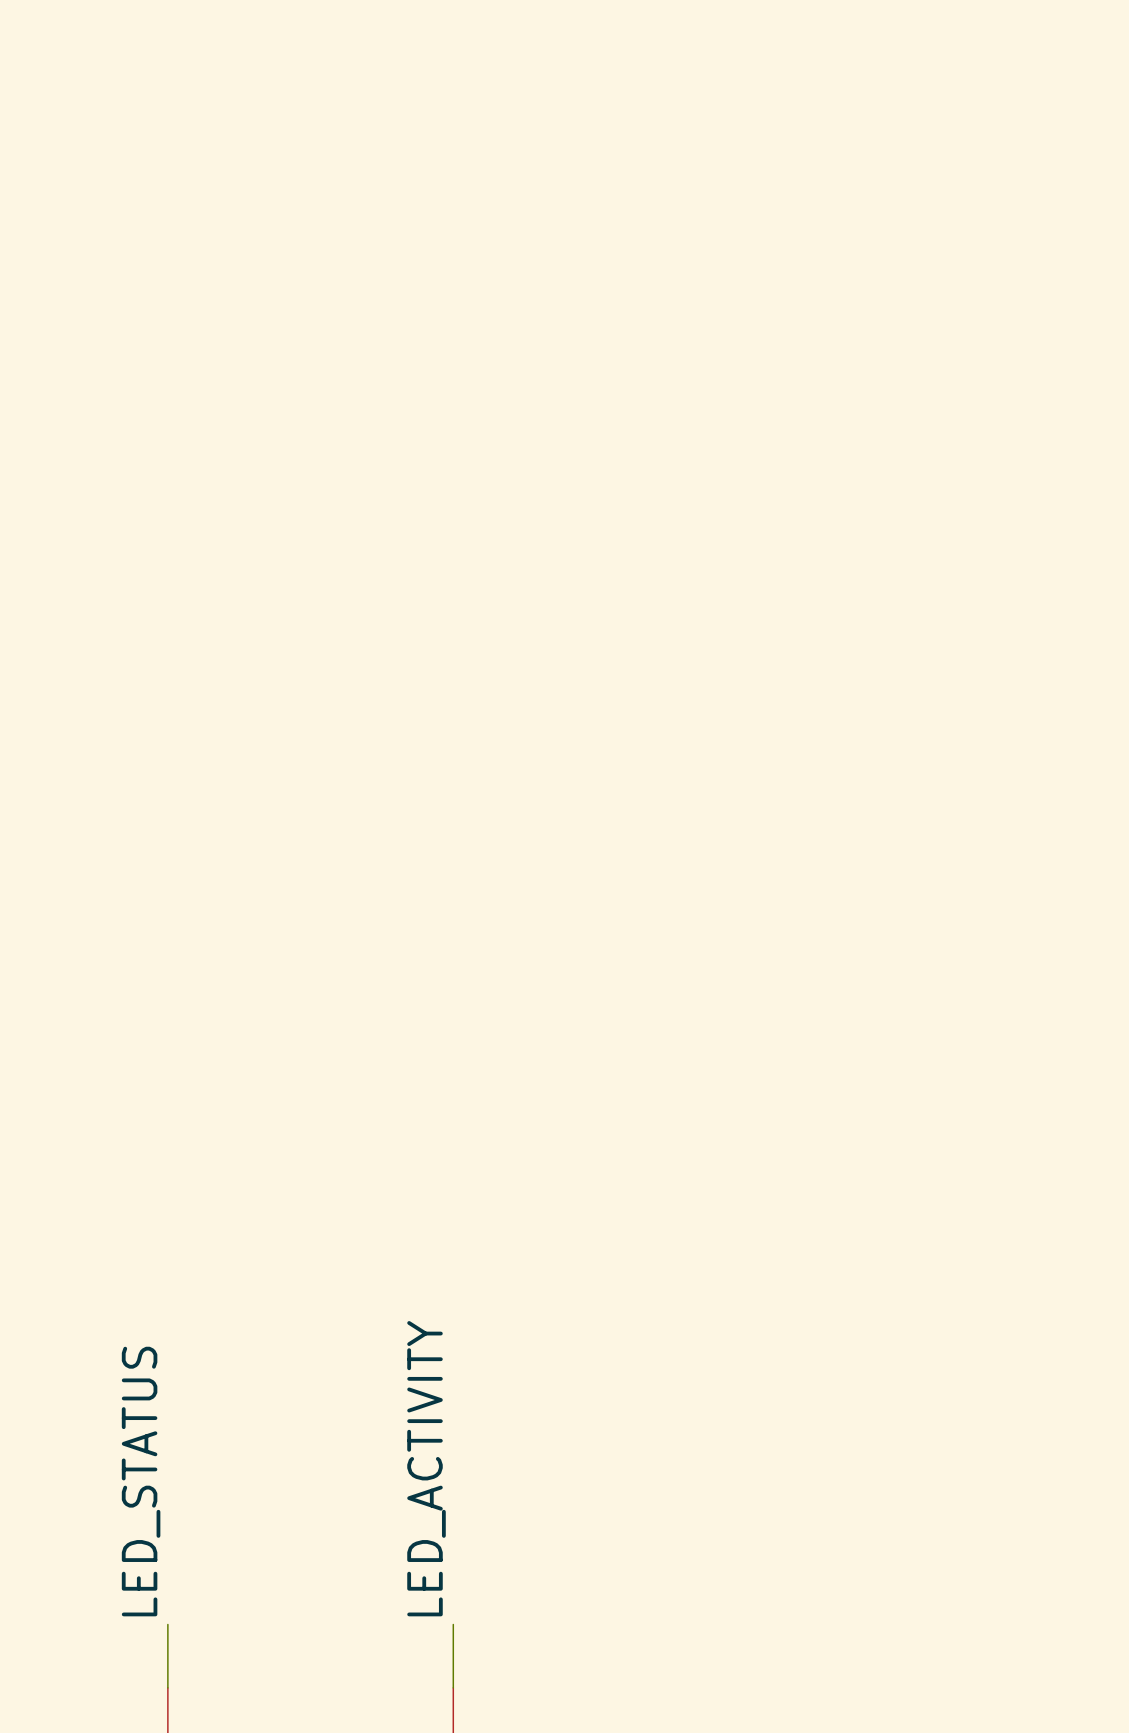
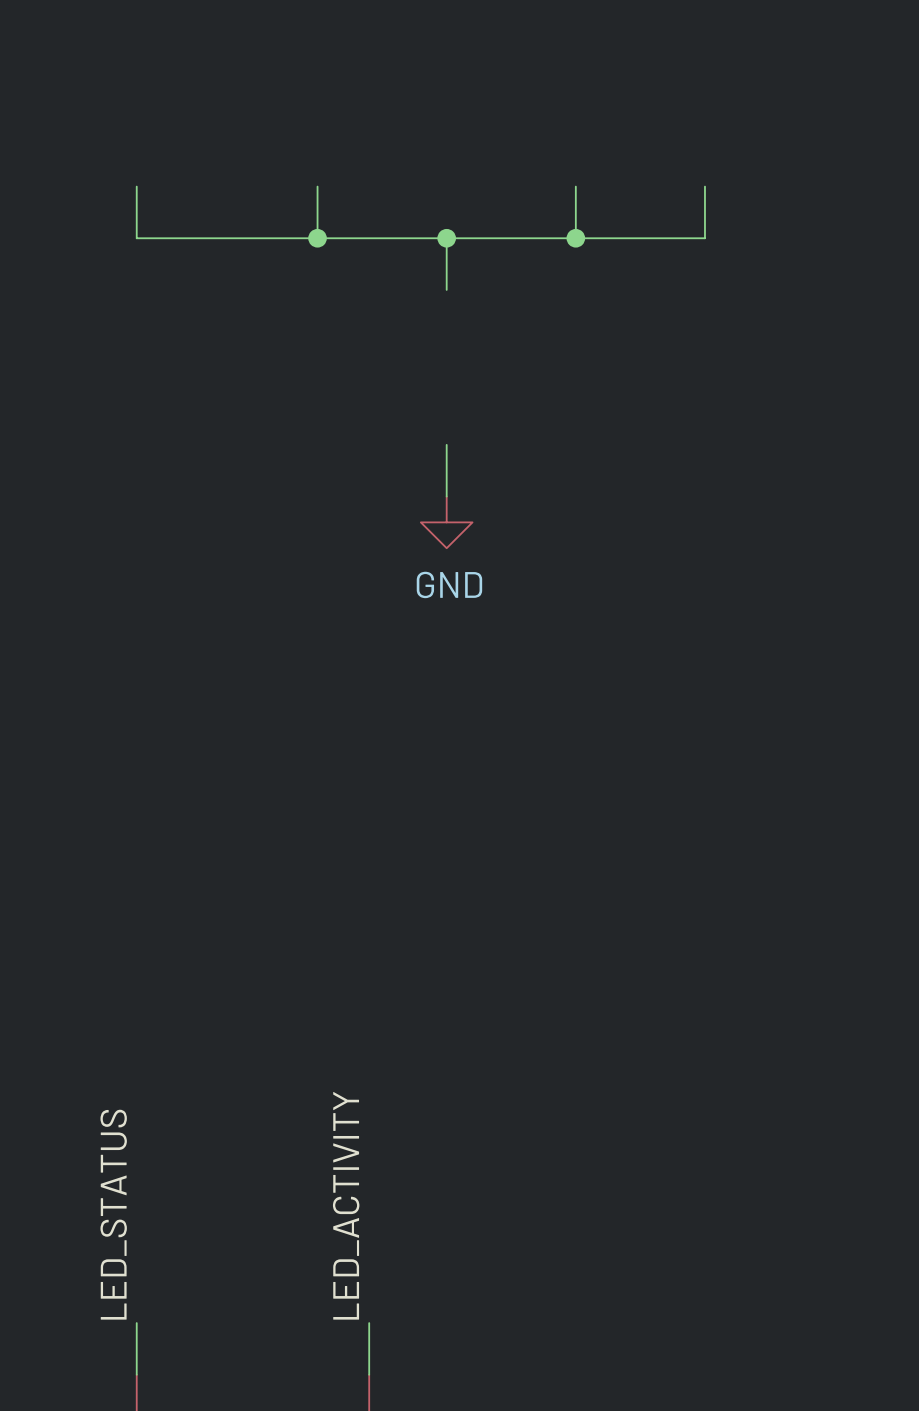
wire: none -> (136, 186) (136, 238) (704, 238) (704, 186)
wire: none -> (317, 186) (317, 238)
wire: none -> (575, 186) (575, 238)
junction: none -> (317, 238)
wire: none -> (446, 238) (446, 289)
junction: none -> (446, 238)
junction: none -> (575, 238)
wire: none -> (446, 444) (446, 496)
power symbol: none -> GND (446, 522)

